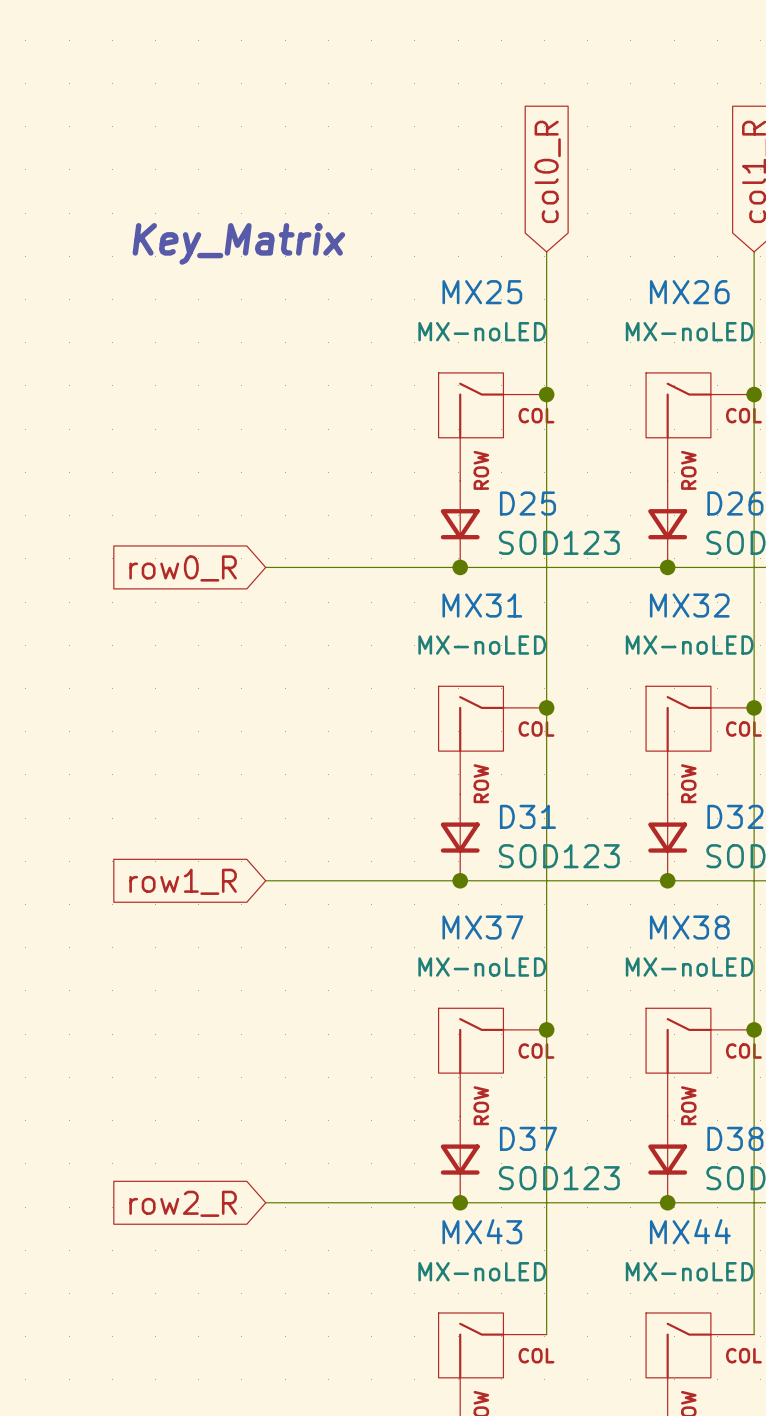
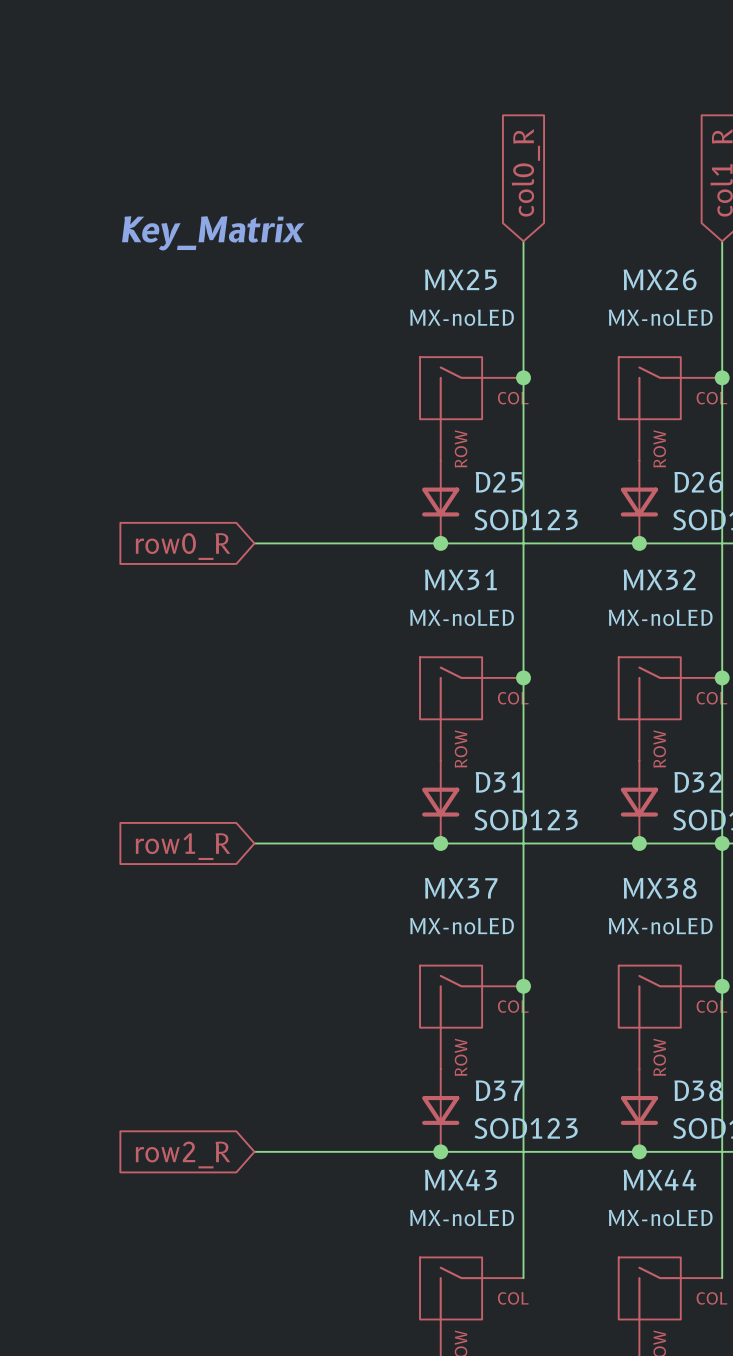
junction: none -> (722, 843)

